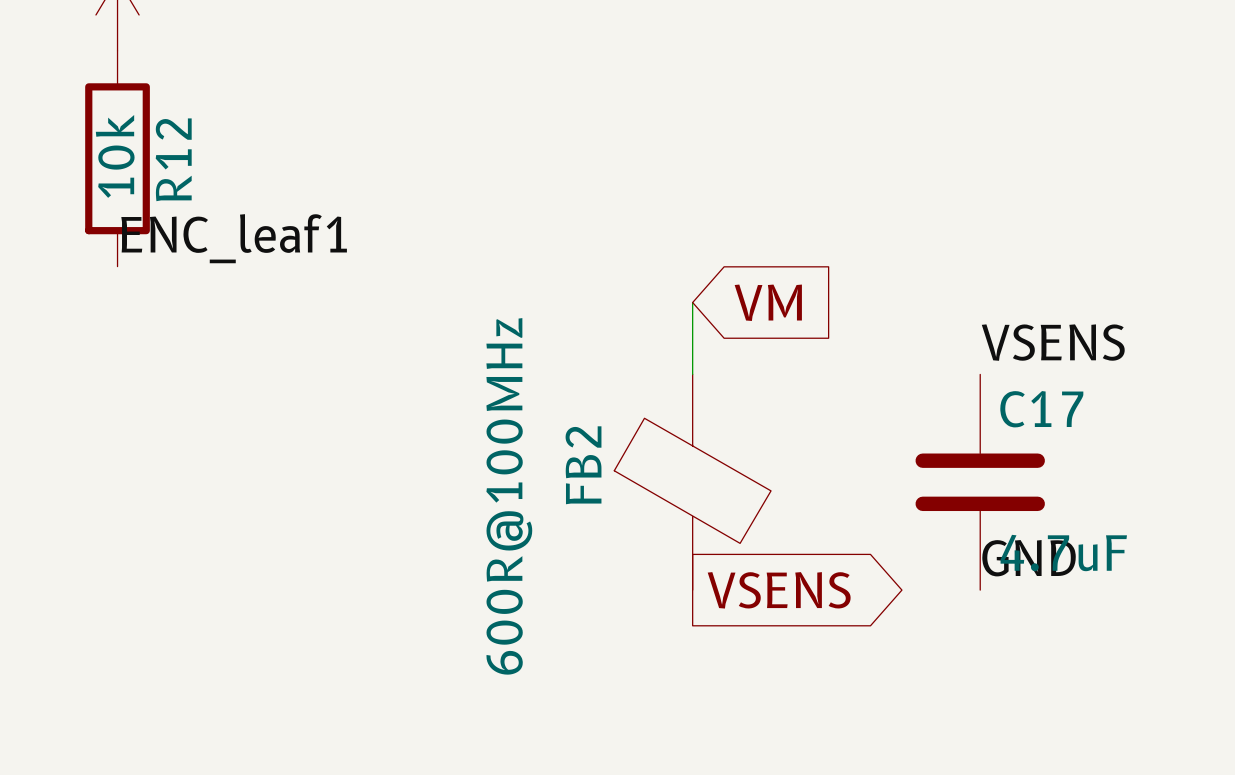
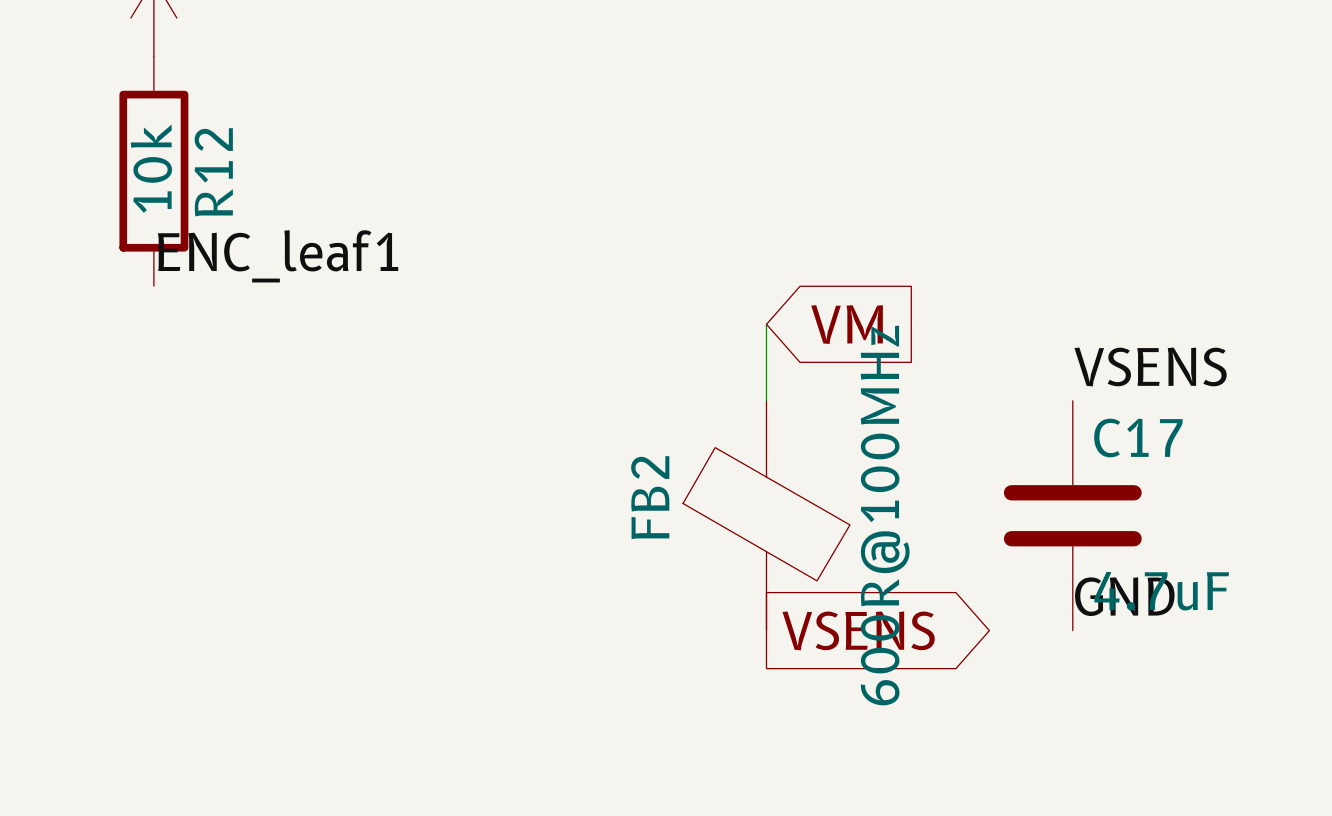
FB2 value position: 600R@100MHz (509, 496) -> 600R@100MHz (885, 515)

